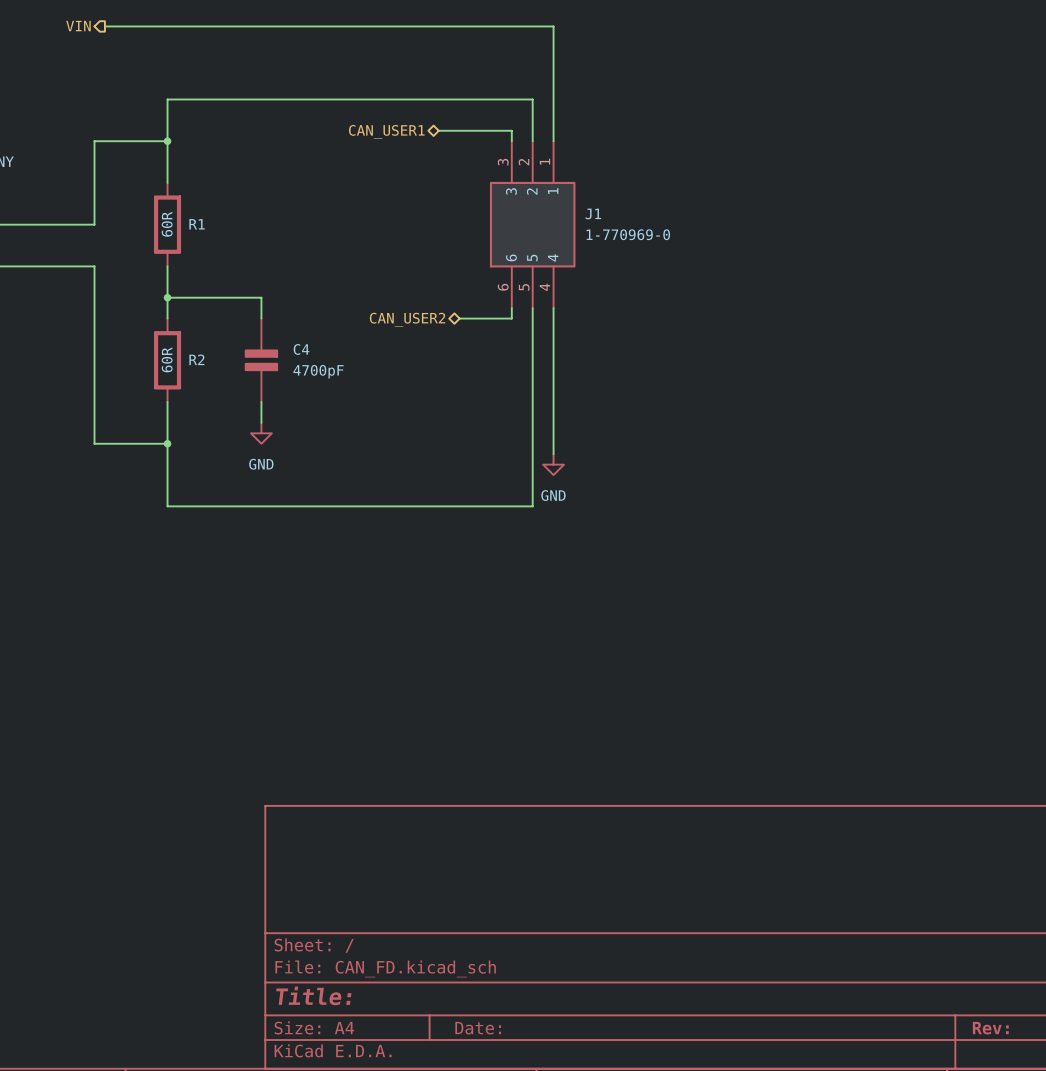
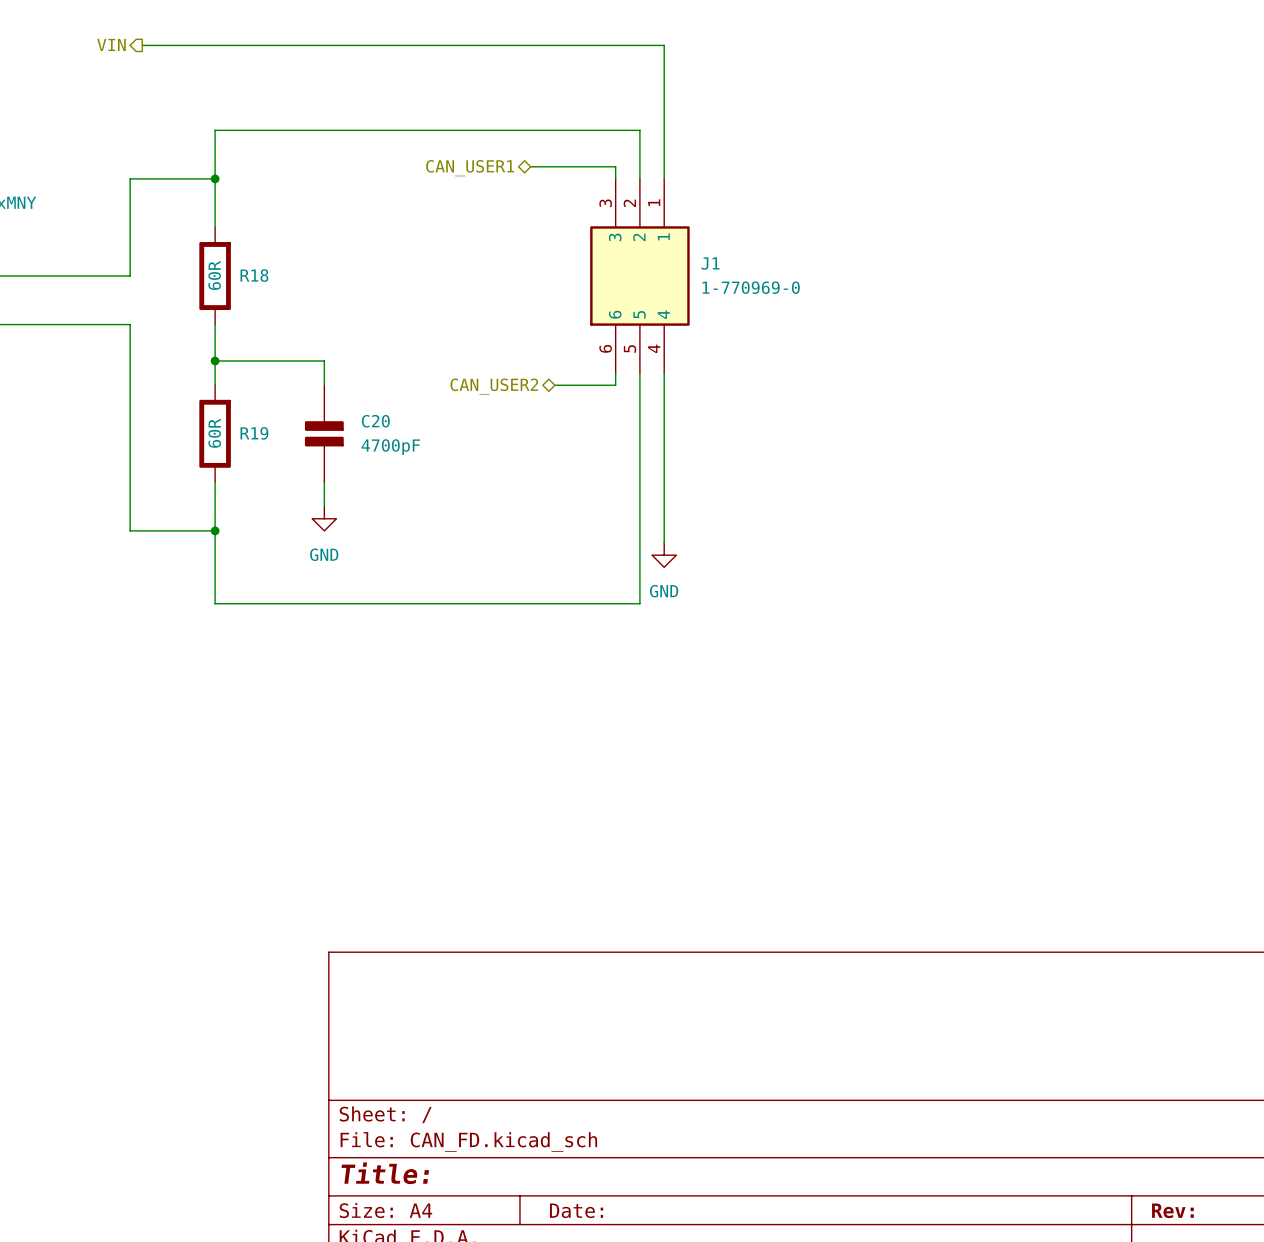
R1 name: R1 (197, 224) -> R18 (254, 275)
C4 name: C4 (301, 349) -> C20 (375, 421)
R2 name: R2 (196, 359) -> R19 (254, 433)

